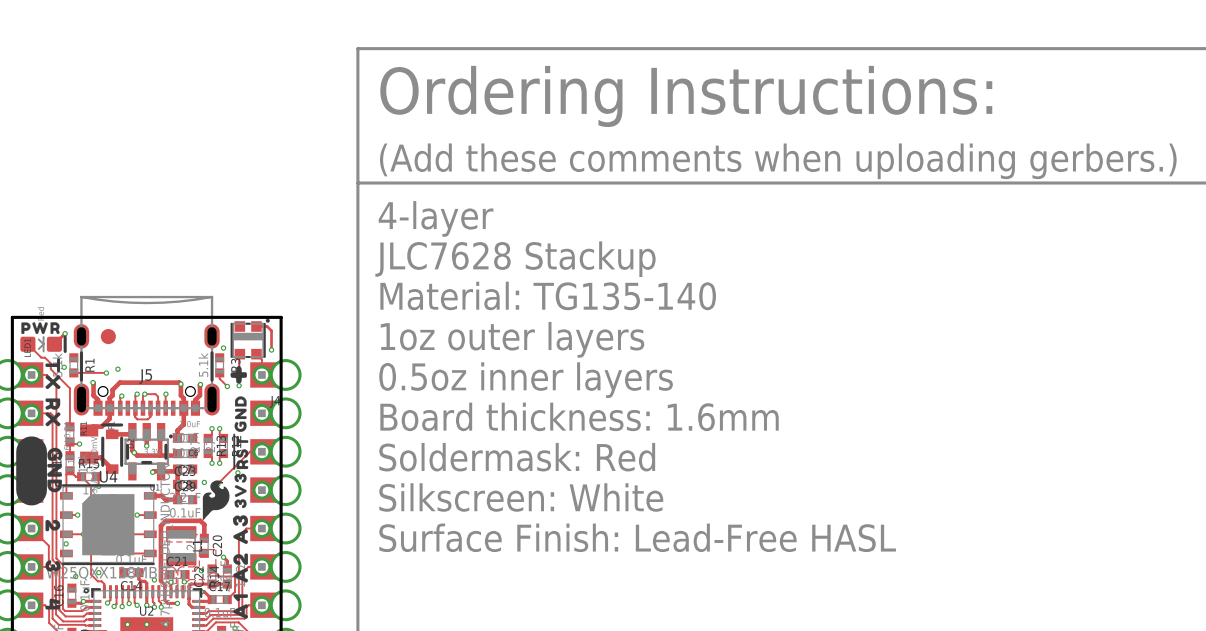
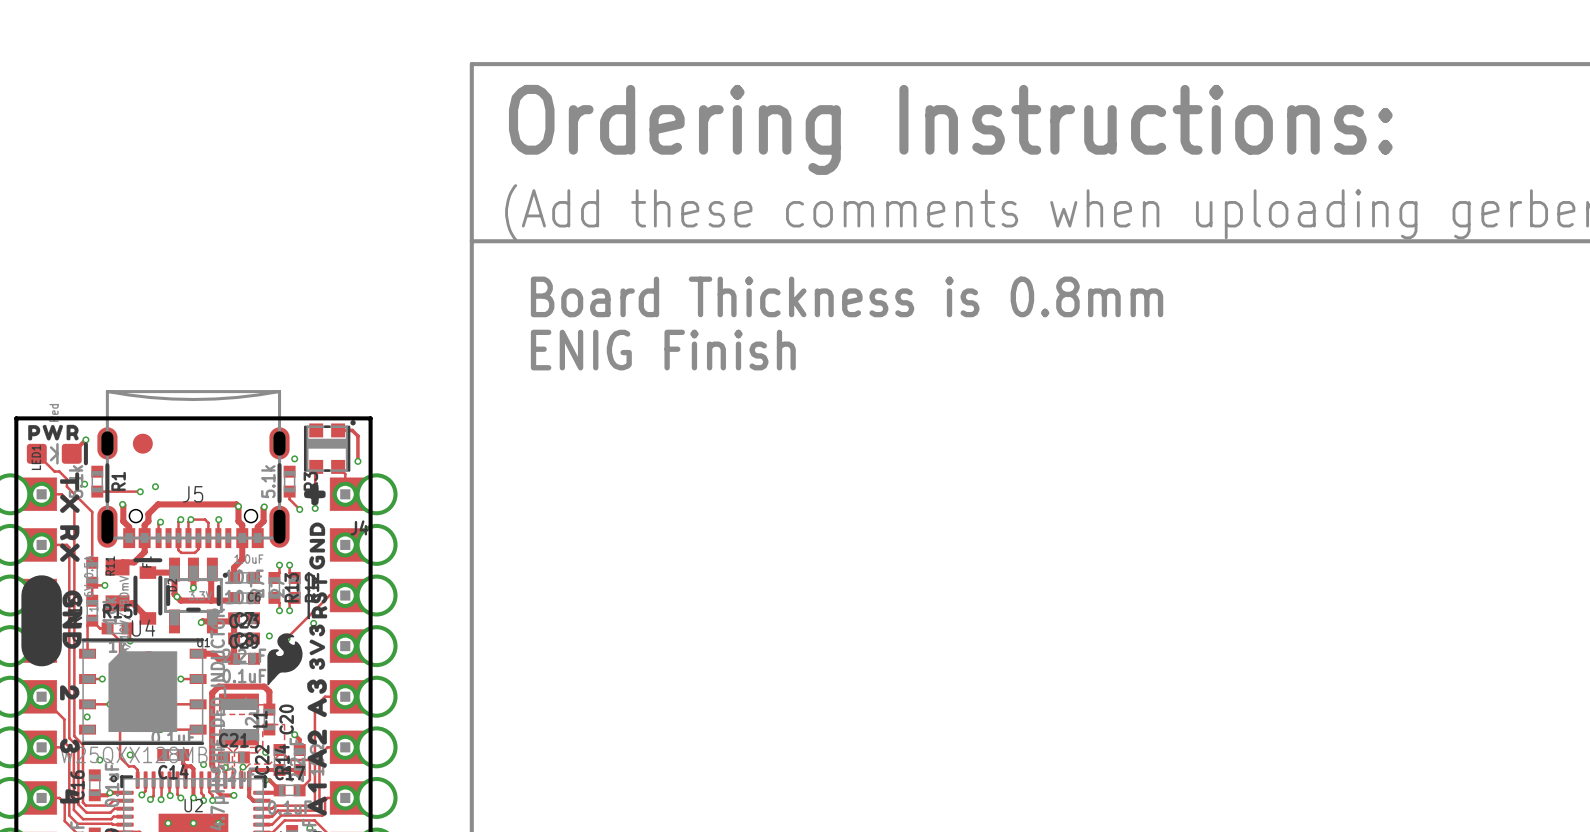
text: 4-layer (436, 218) -> none
text: none -> Board Thickness is 0.8mm (847, 296)
text: JLC7628 Stackup (515, 259) -> none
text: none -> ENIG Finish (663, 350)
text: Material: TG135-140 (548, 295) -> none
text: 1oz outer layers (512, 339) -> none
text: 0.5oz inner layers (526, 380) -> none
text: Board thickness: 1.6mm (579, 416) -> none
text: Soldermask: Red (517, 457) -> none
text: Silkscreen: White (521, 497) -> none
text: Surface Finish: Lead-Free HASL (637, 537) -> none

